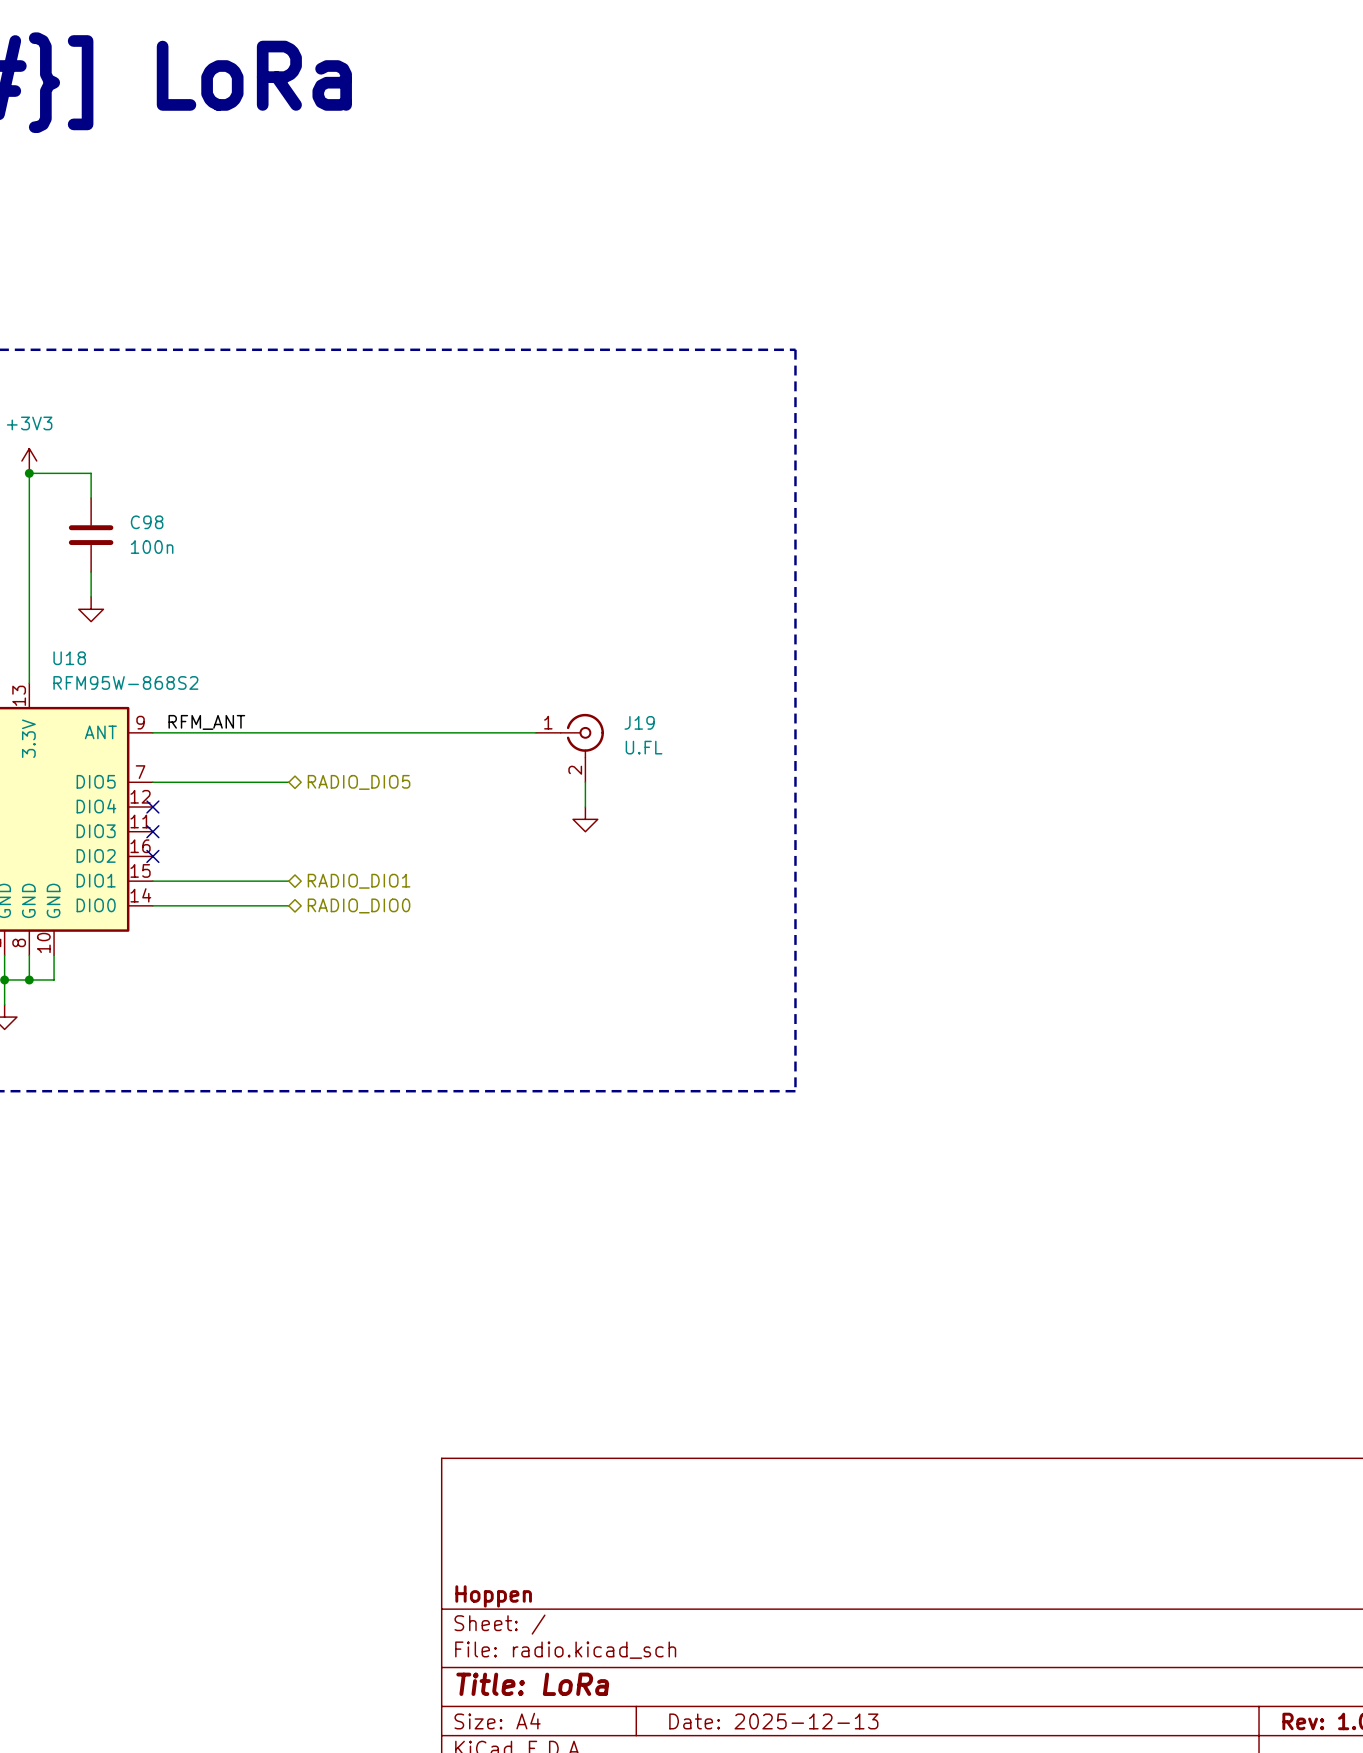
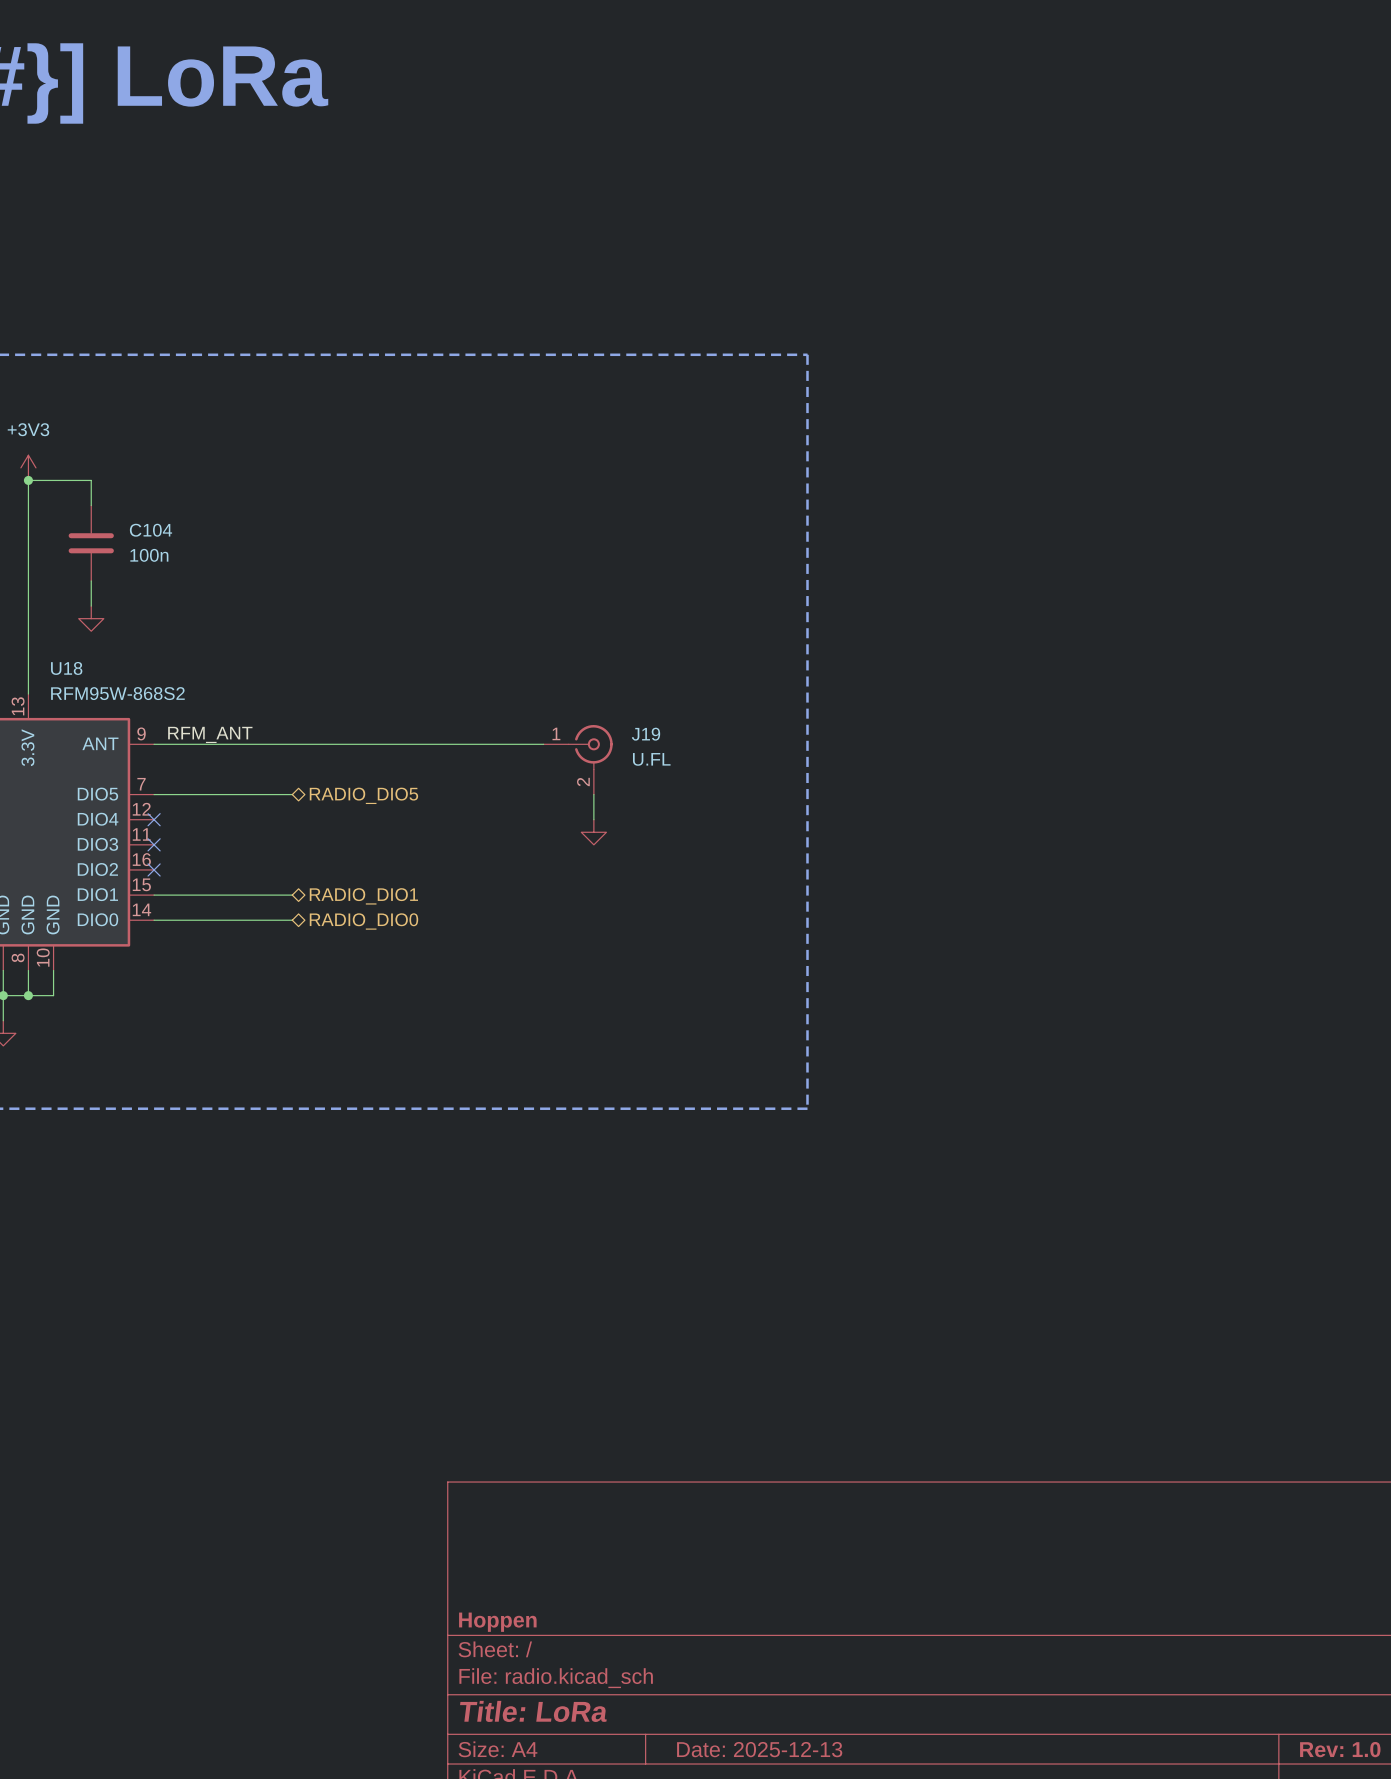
C98 name: C98 (147, 522) -> C104 (150, 530)

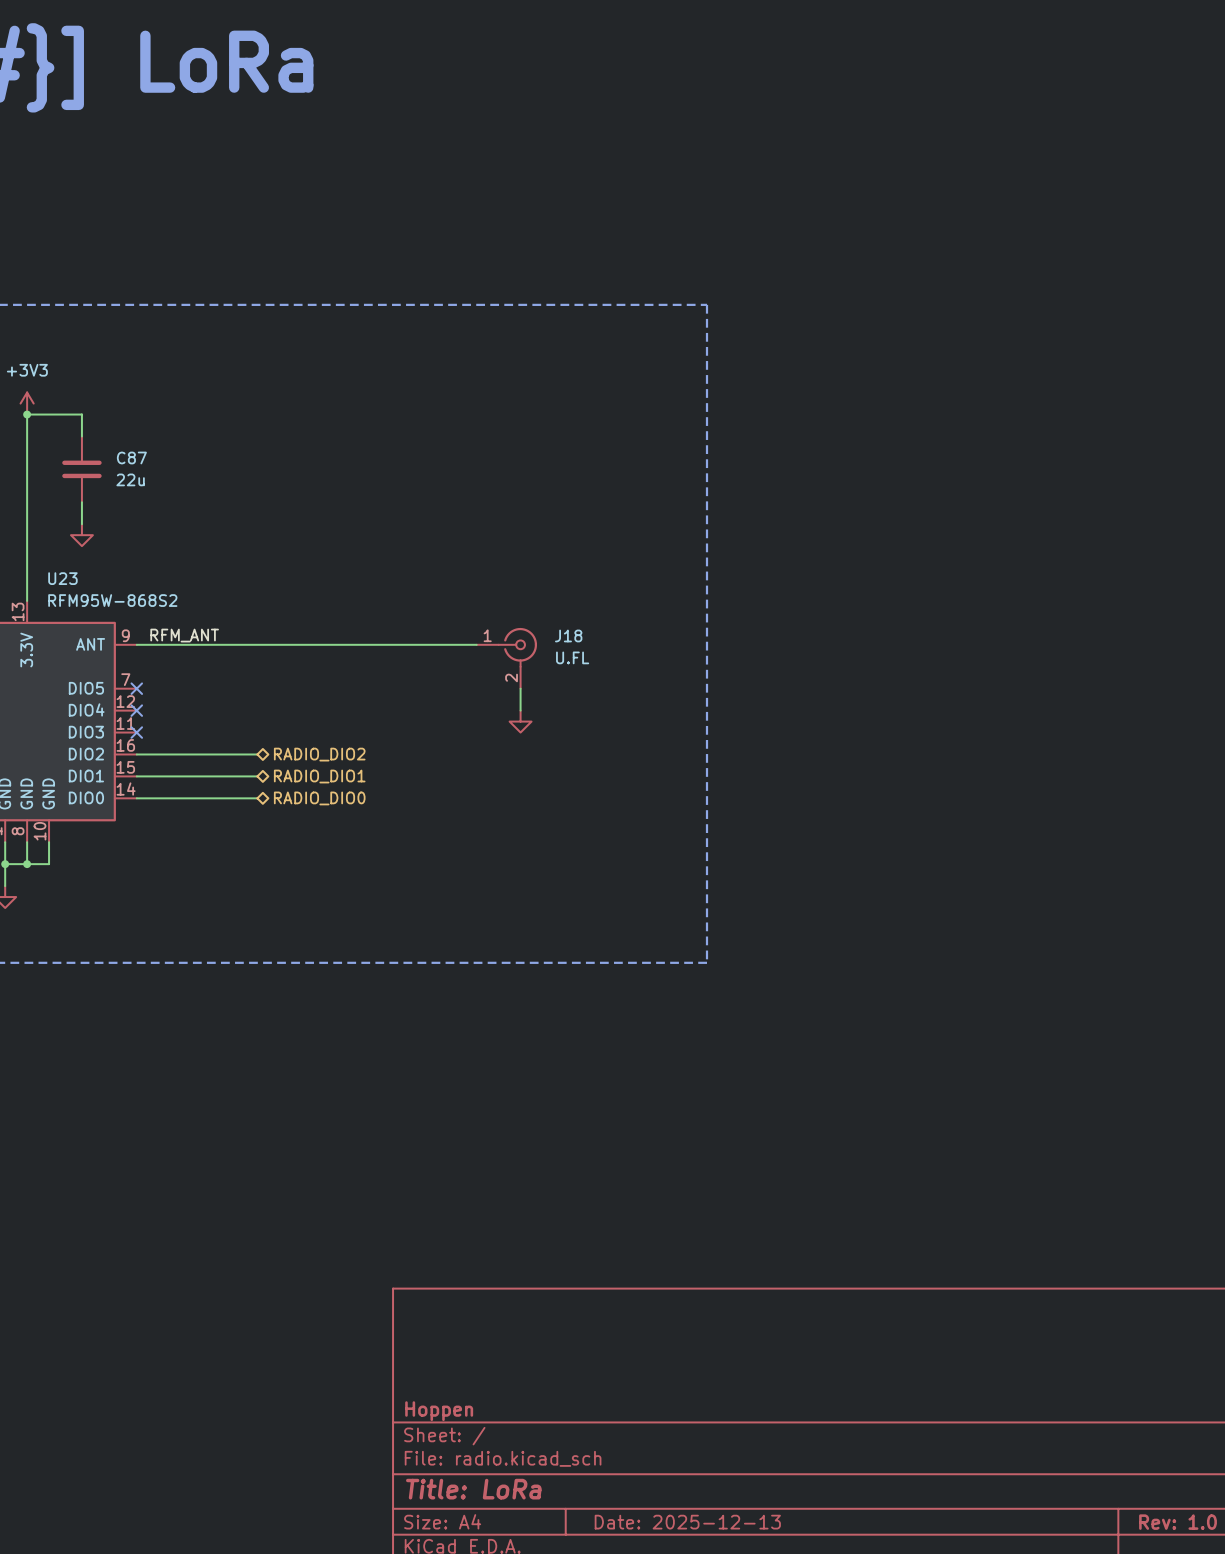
C104 name: C104 (150, 530) -> C87 (131, 457)
C104 value: 100n (149, 555) -> 22u (130, 479)
U18 name: U18 (66, 668) -> U23 (62, 578)
J19 name: J19 (646, 734) -> J18 (568, 635)
wire: (154, 794) (292, 794) -> (136, 754) (257, 754)
no-connect mark: none -> (136, 688)
hierarchical label: RADIO_DIO5 (363, 795) -> none
no-connect mark: (154, 869) -> none
hierarchical label: none -> RADIO_DIO2 (319, 754)

